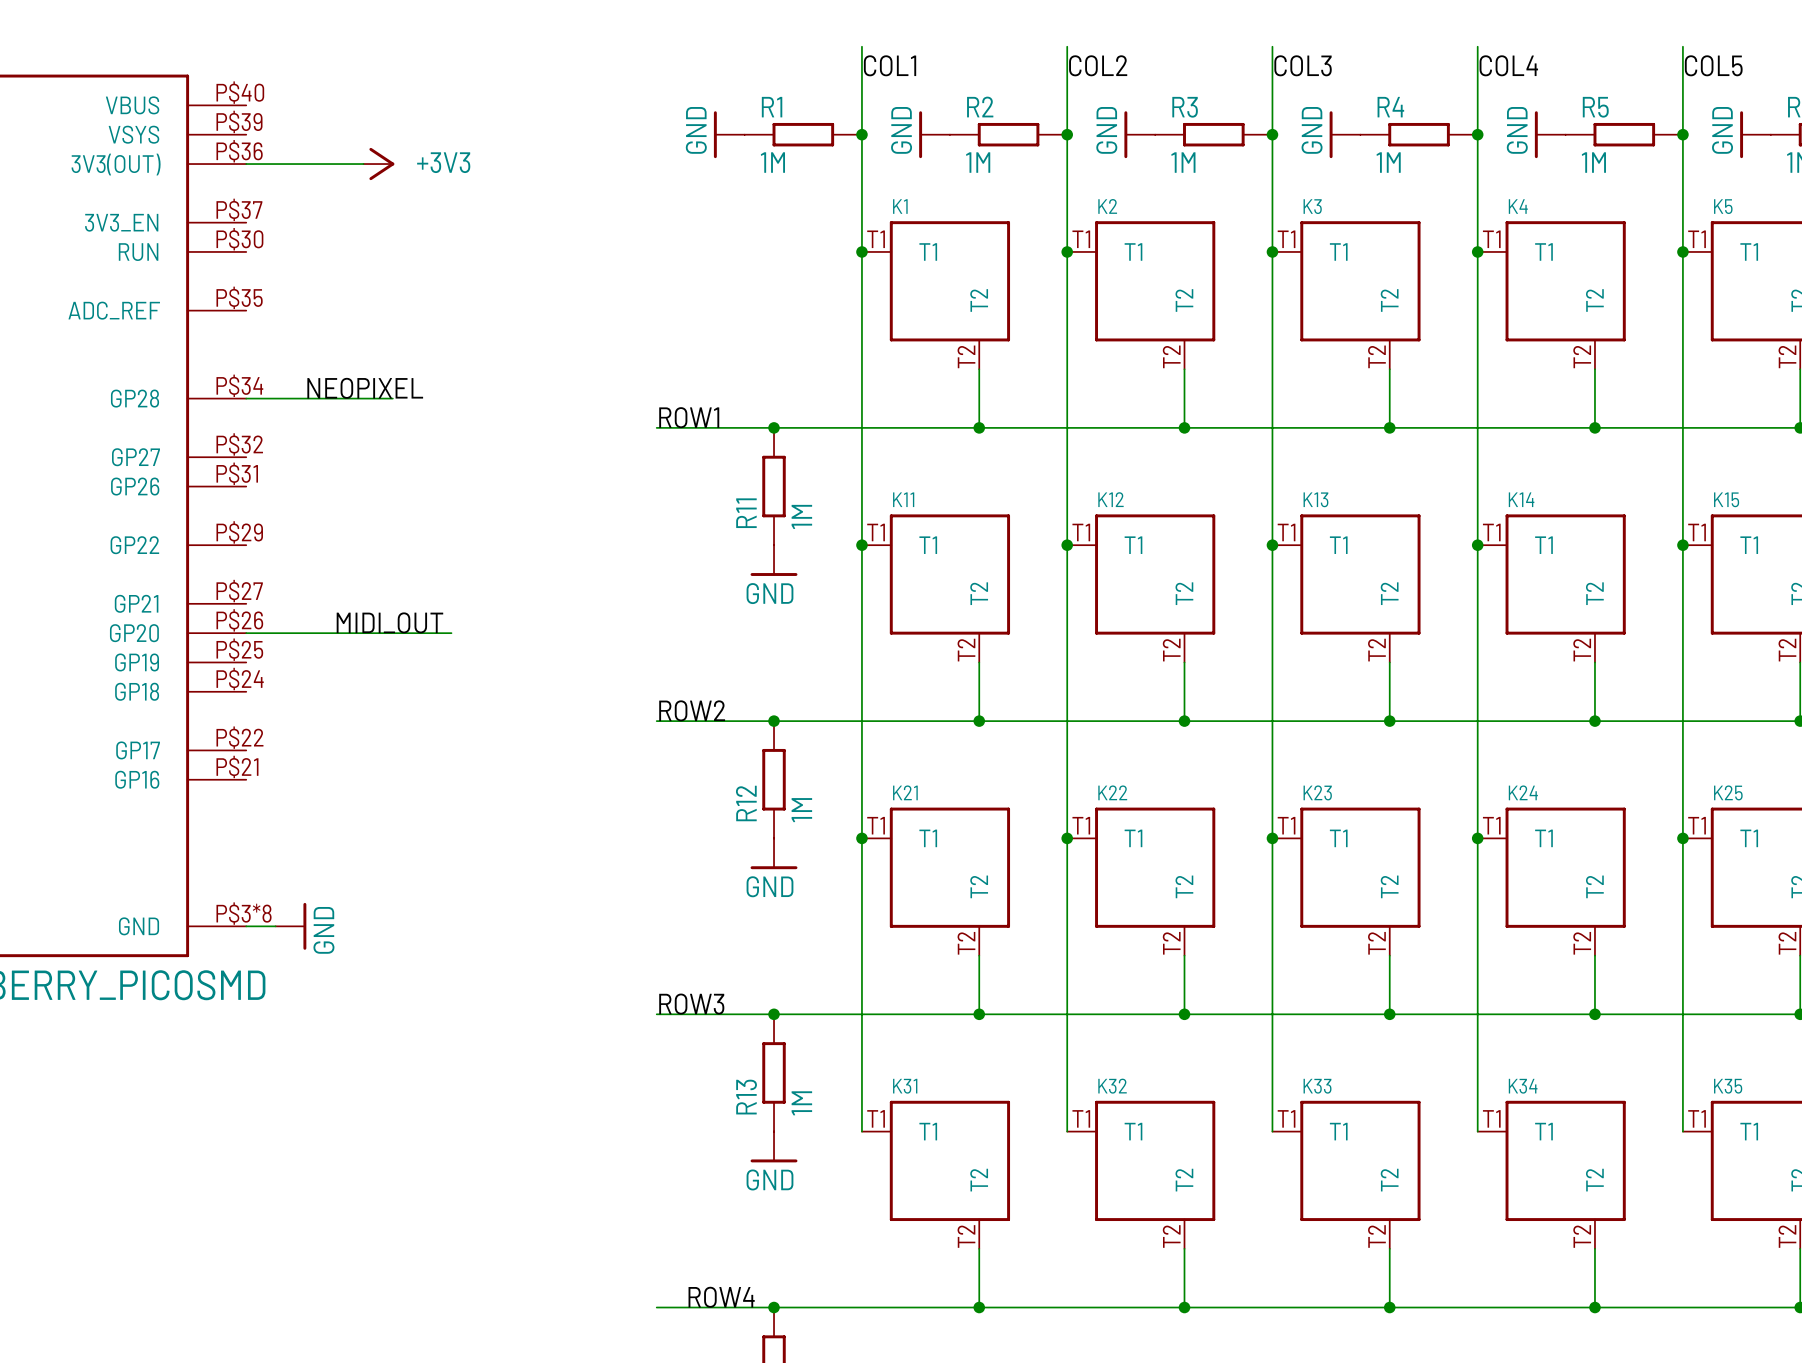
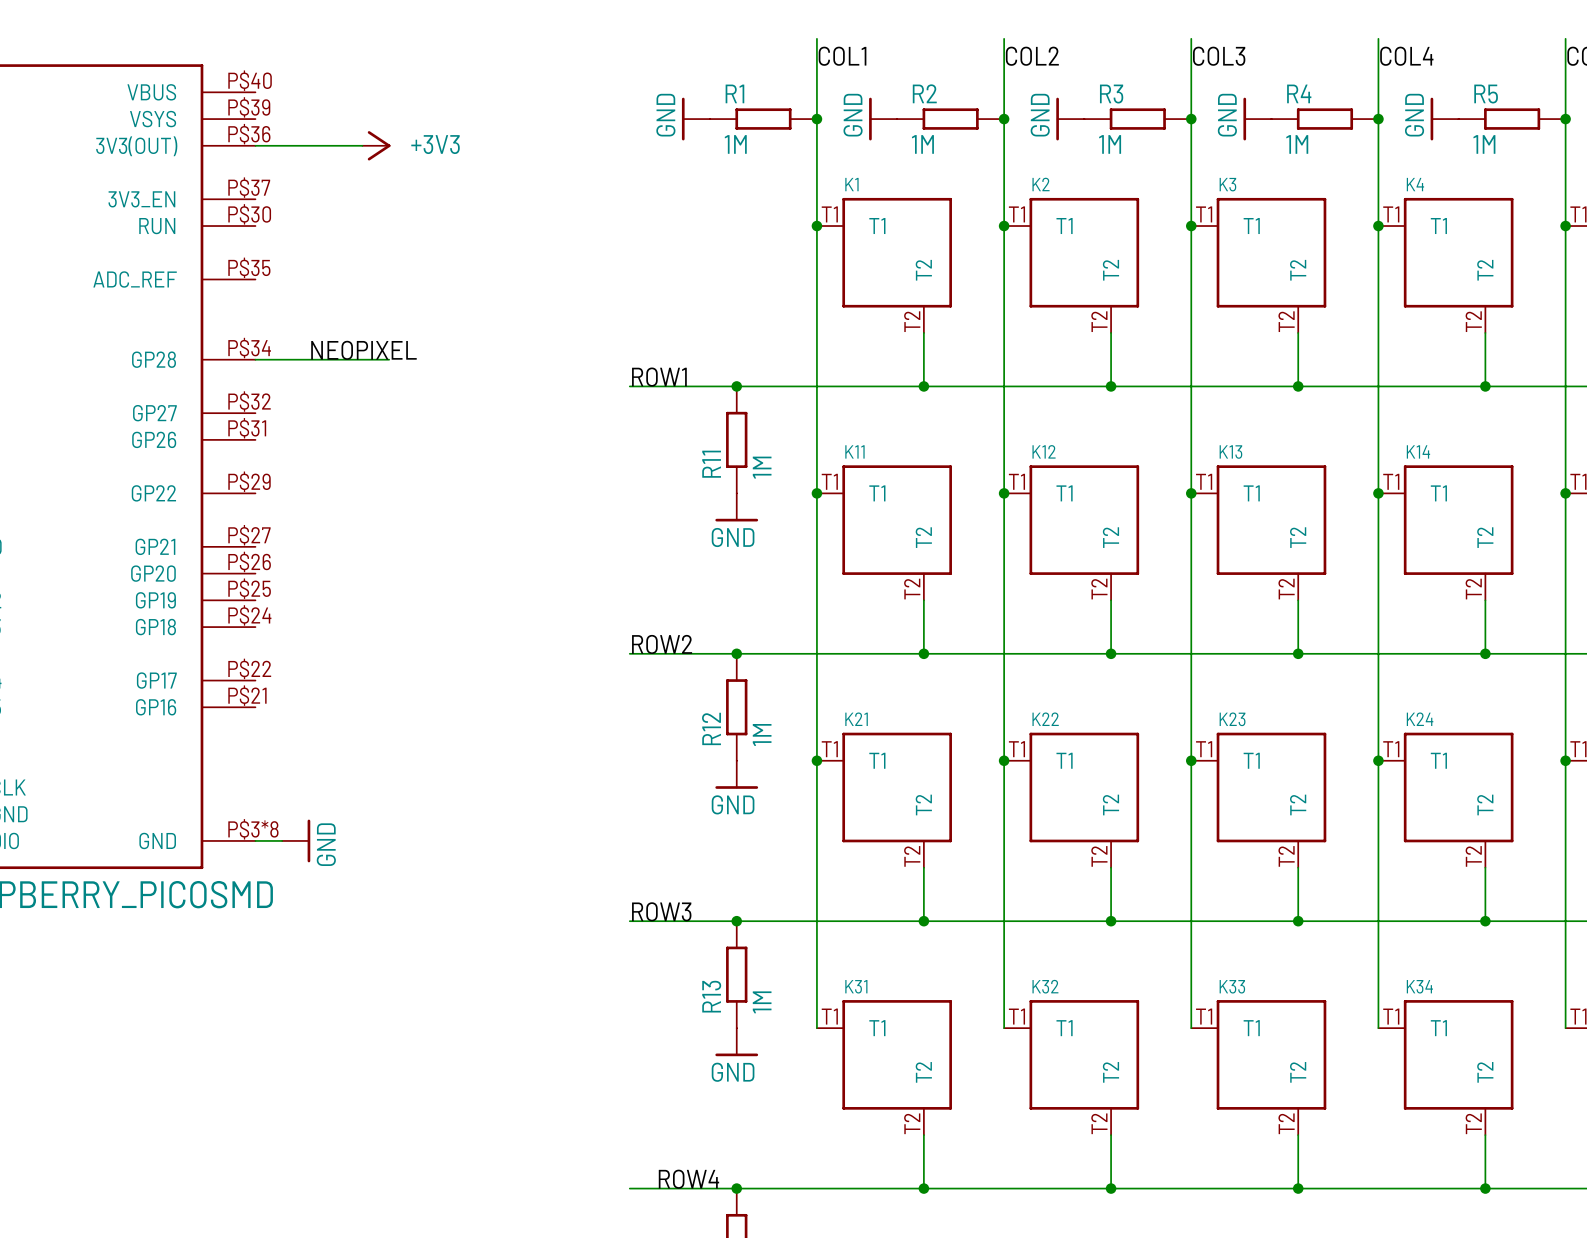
label: MIDI_OUT (389, 622) -> none
wire: (246, 633) (451, 633) -> none

